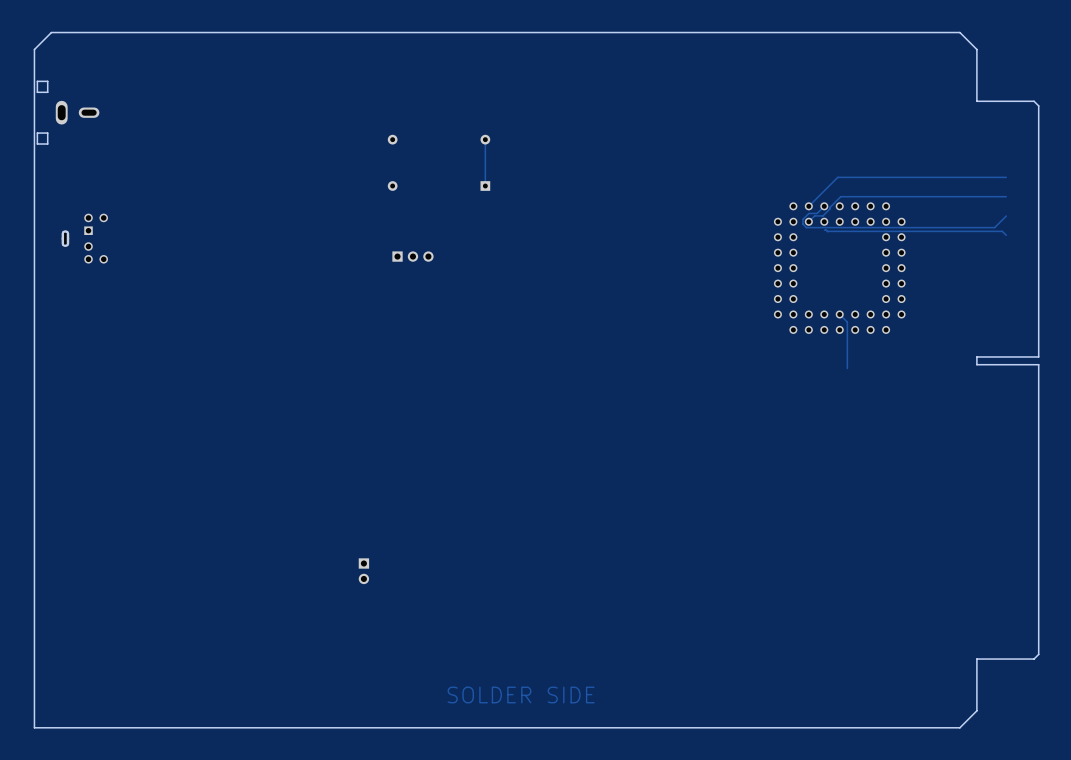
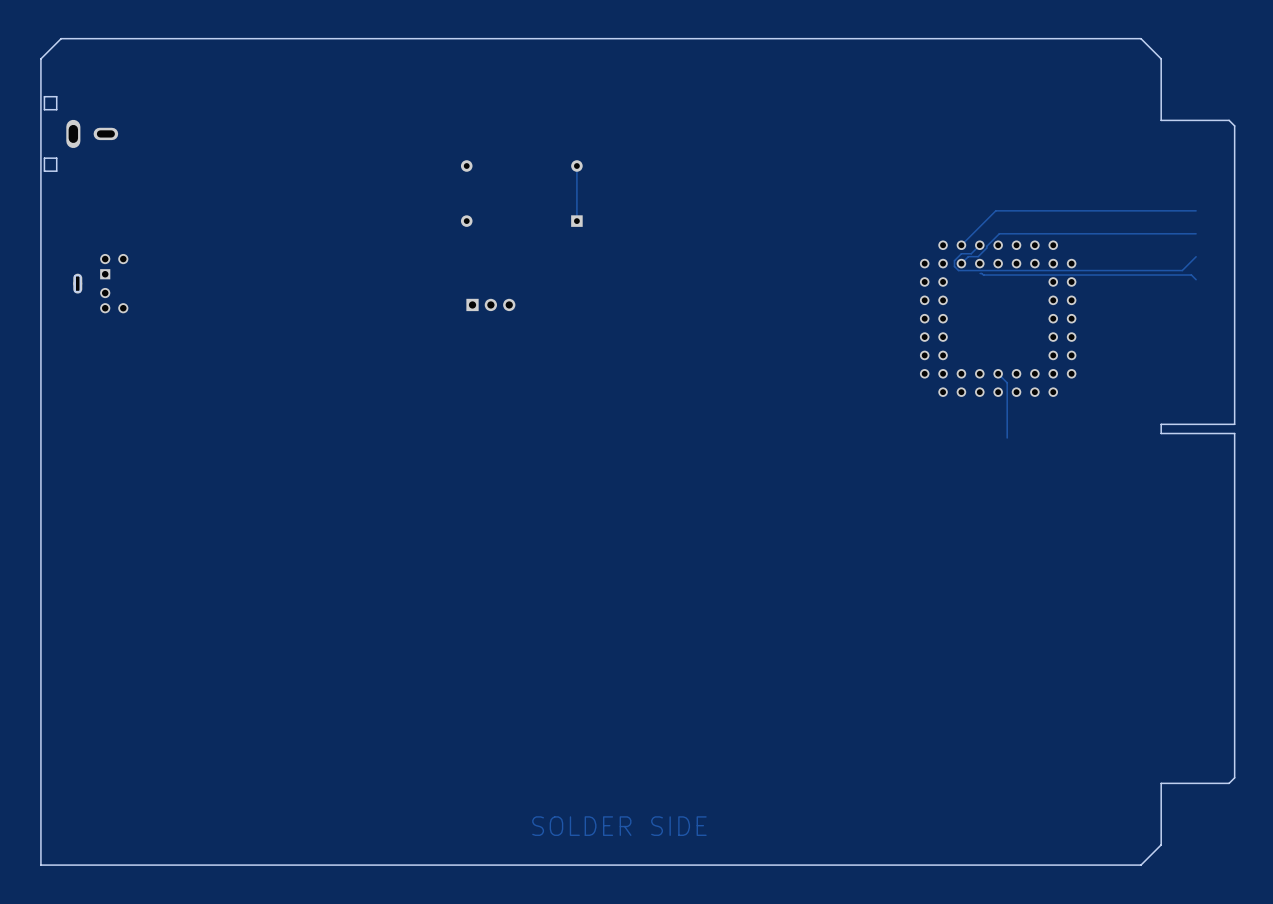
part: (363, 571) -> none

